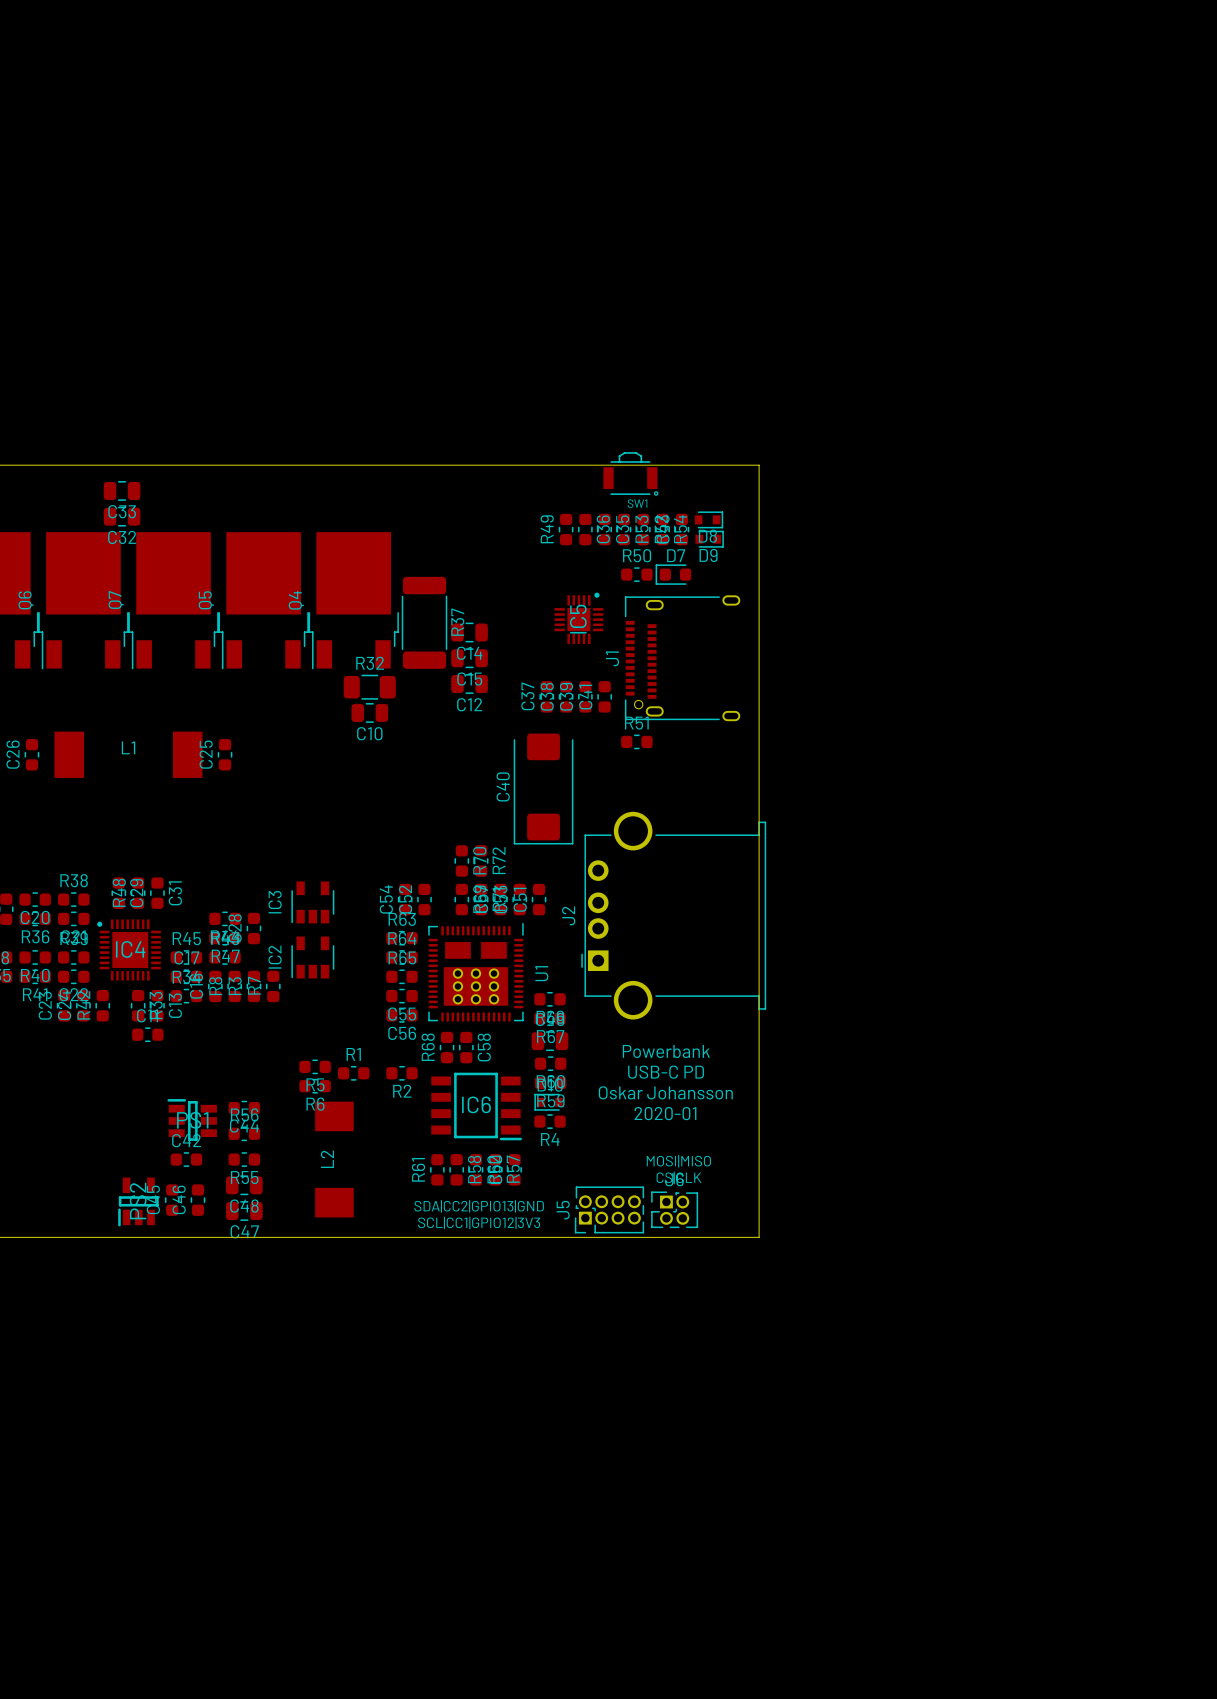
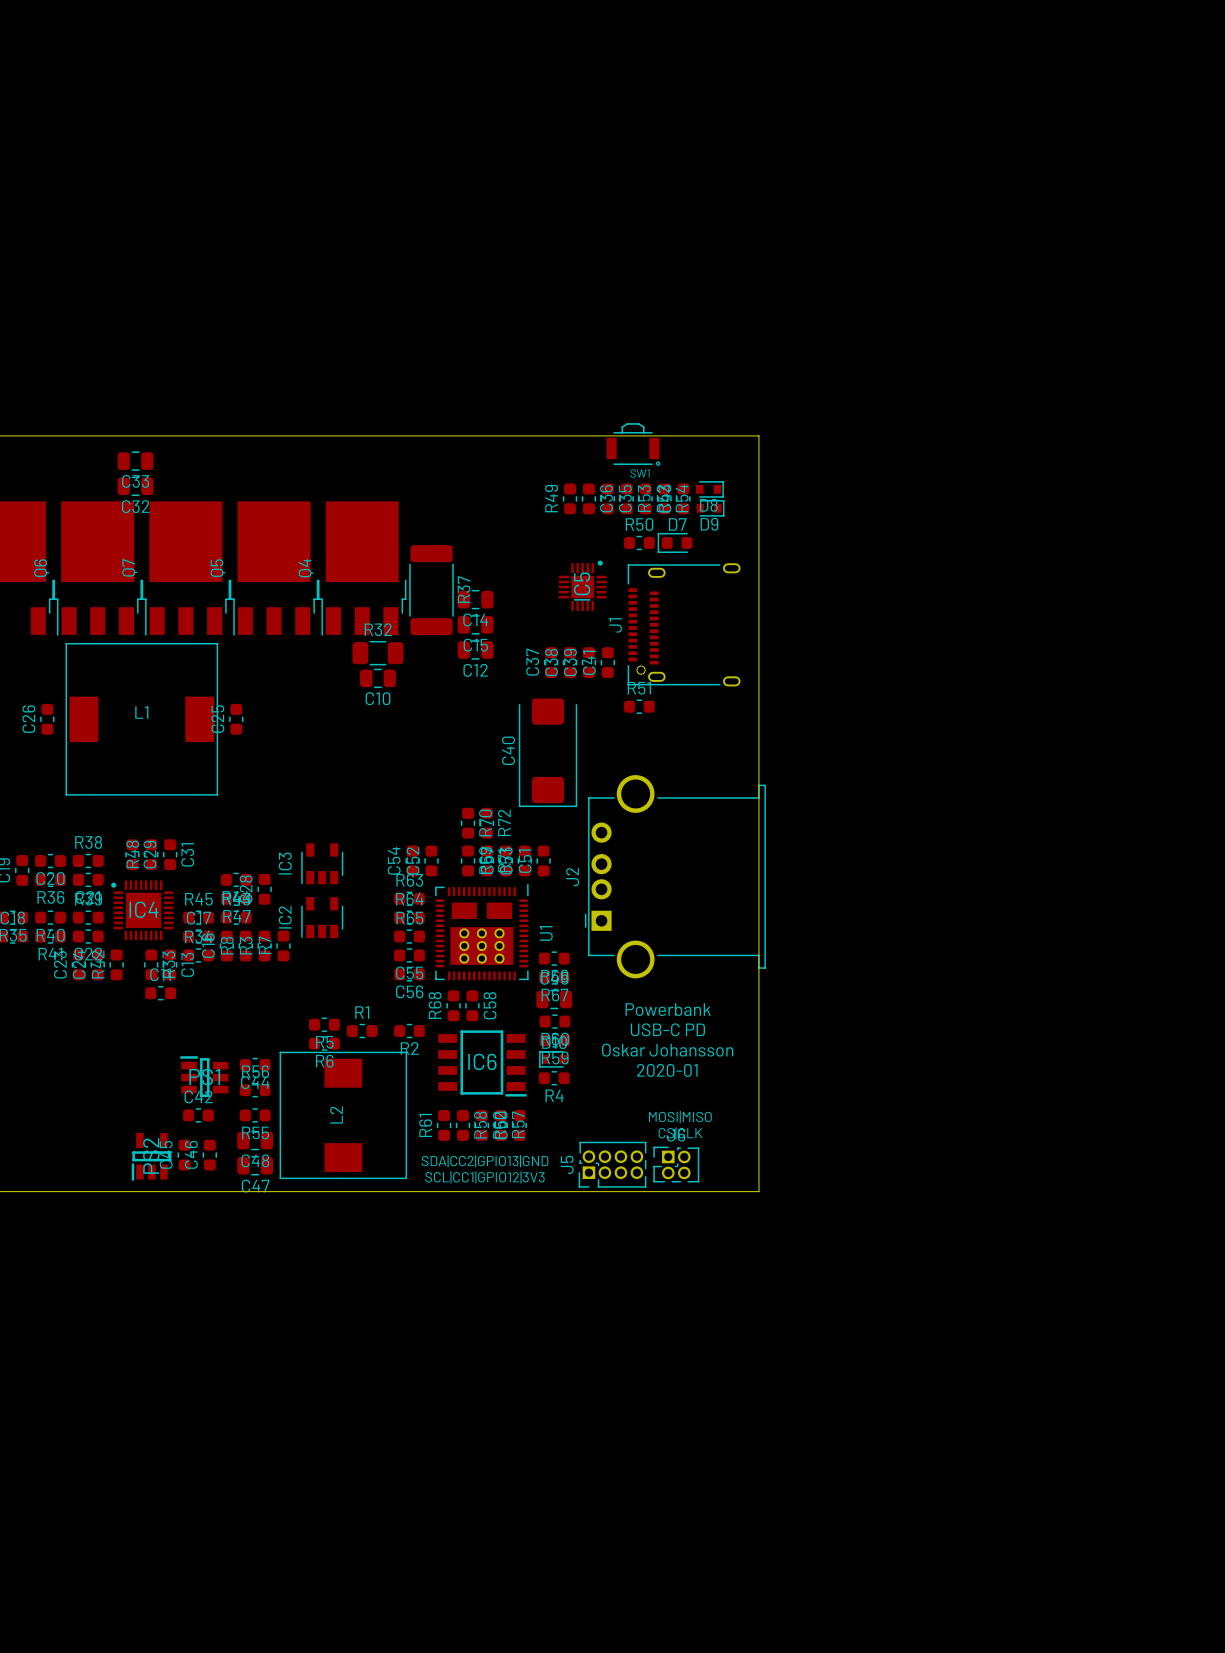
Q6 footprint: [38, 532, 129, 670] -> [53, 501, 142, 636]
Q7 footprint: [128, 532, 219, 670] -> [141, 501, 231, 636]
Q5 footprint: [218, 532, 309, 670] -> [229, 501, 319, 636]
Q4 footprint: [308, 532, 399, 670] -> [318, 501, 407, 636]
L1 footprint: [54, 731, 203, 778] -> [65, 642, 219, 796]
L2 footprint: [315, 1101, 354, 1218] -> [279, 1051, 408, 1180]

